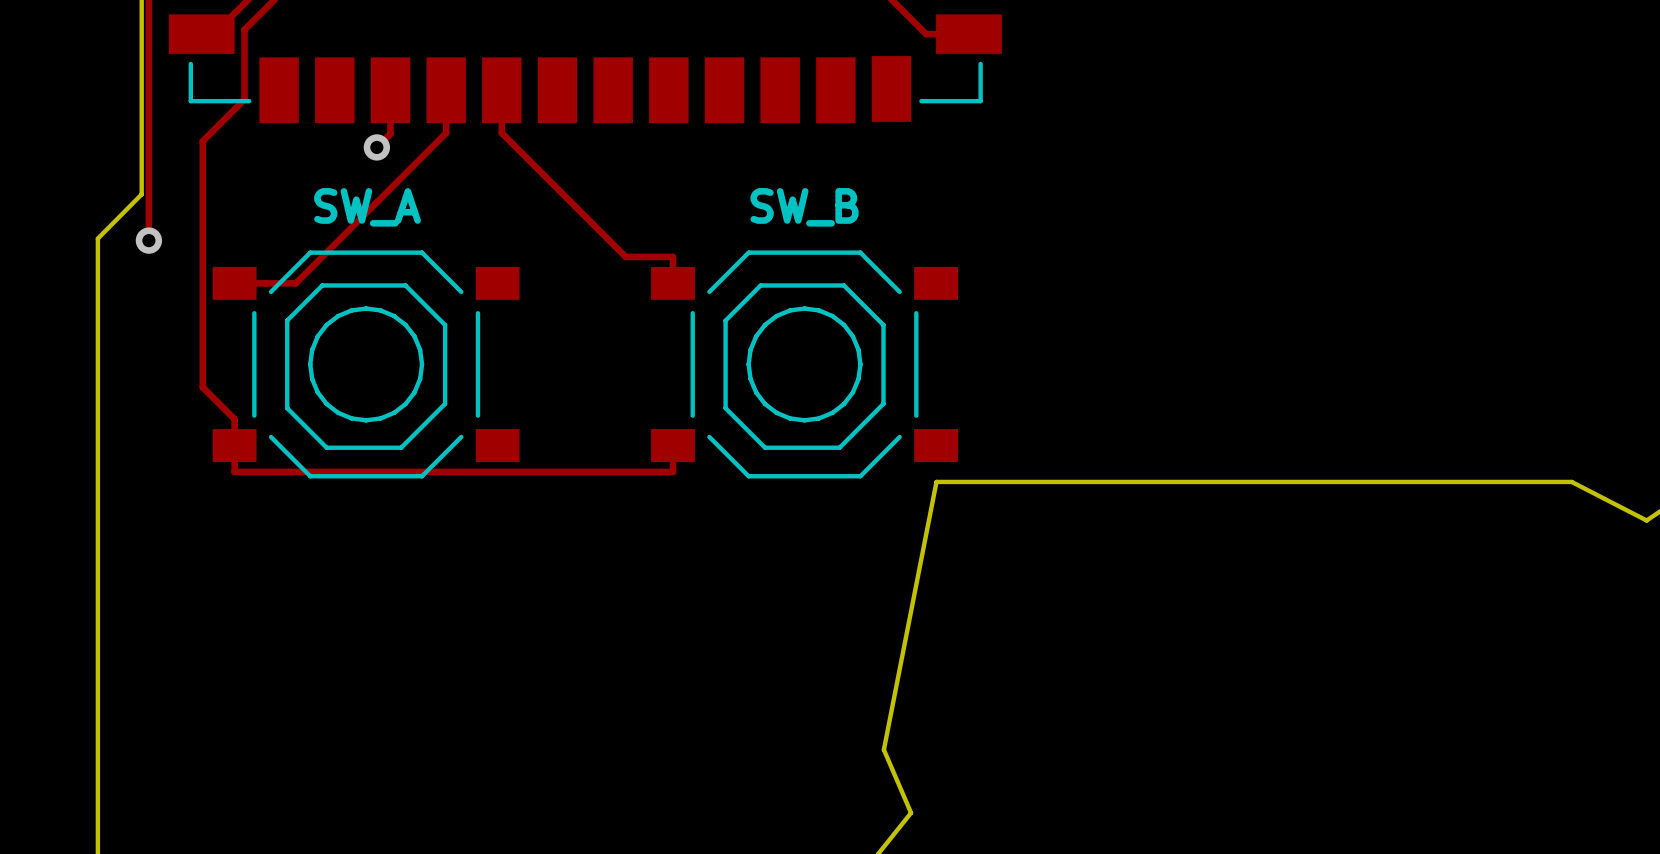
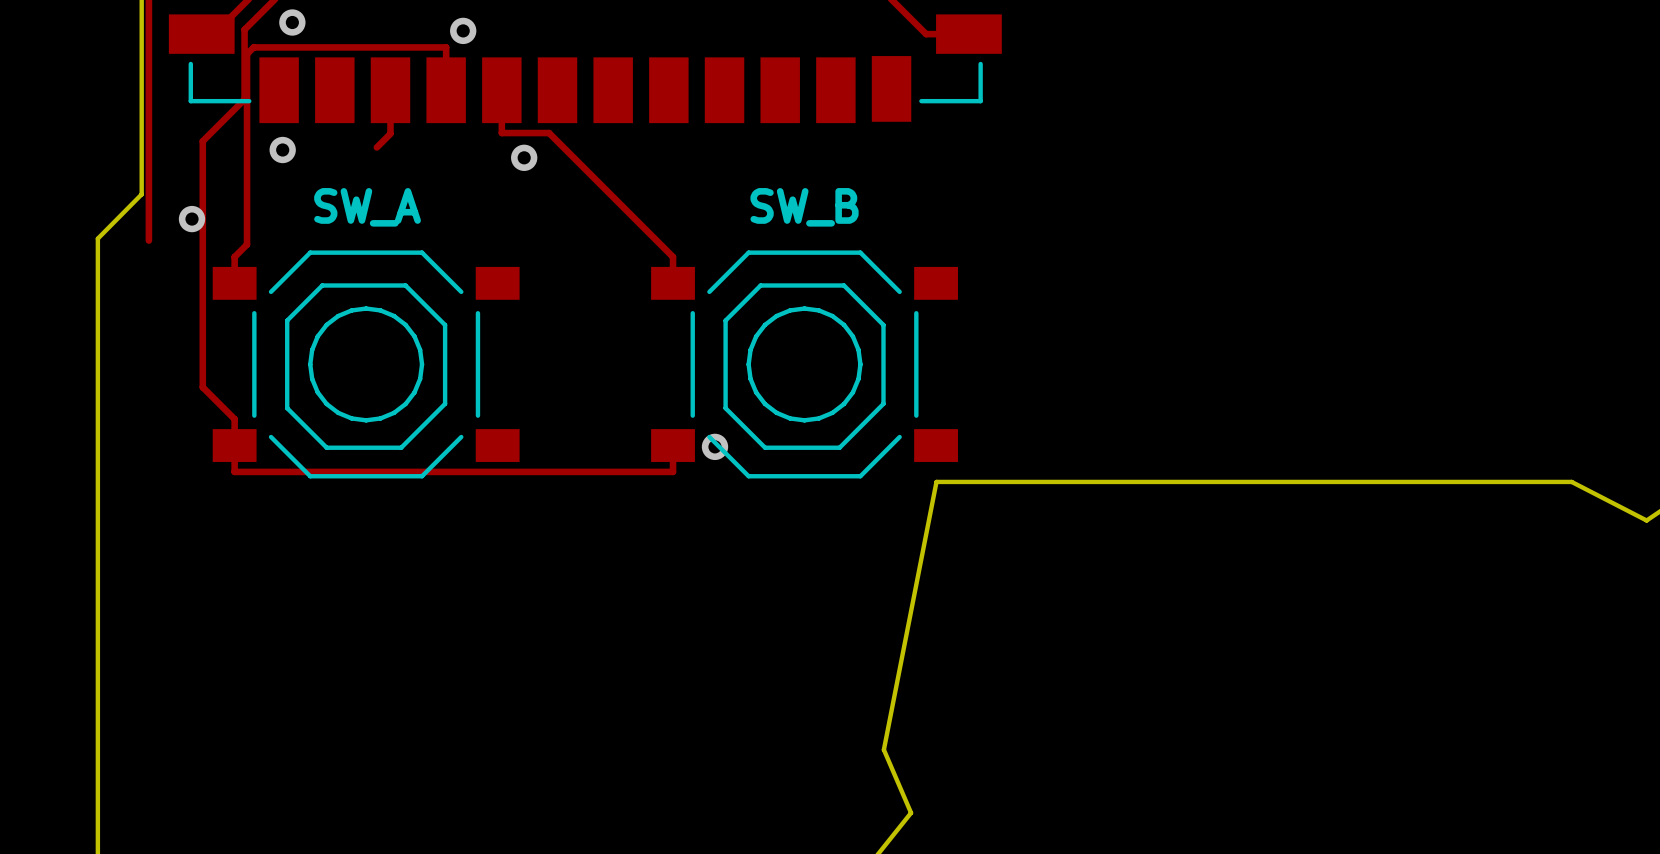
via: none -> (292, 22)
via: none -> (463, 30)
track: (446, 90) (446, 133) (295, 283) (234, 283) -> (446, 90) (446, 47) (253, 47) (247, 54) (247, 244) (234, 256) (234, 283)
track: (501, 133) (625, 256) (673, 256) -> (501, 133) (549, 133) (673, 256)
via: (376, 147) -> none
via: none -> (282, 150)
via: none -> (524, 157)
via position: (148, 240) -> (192, 219)
via: none -> (714, 446)

